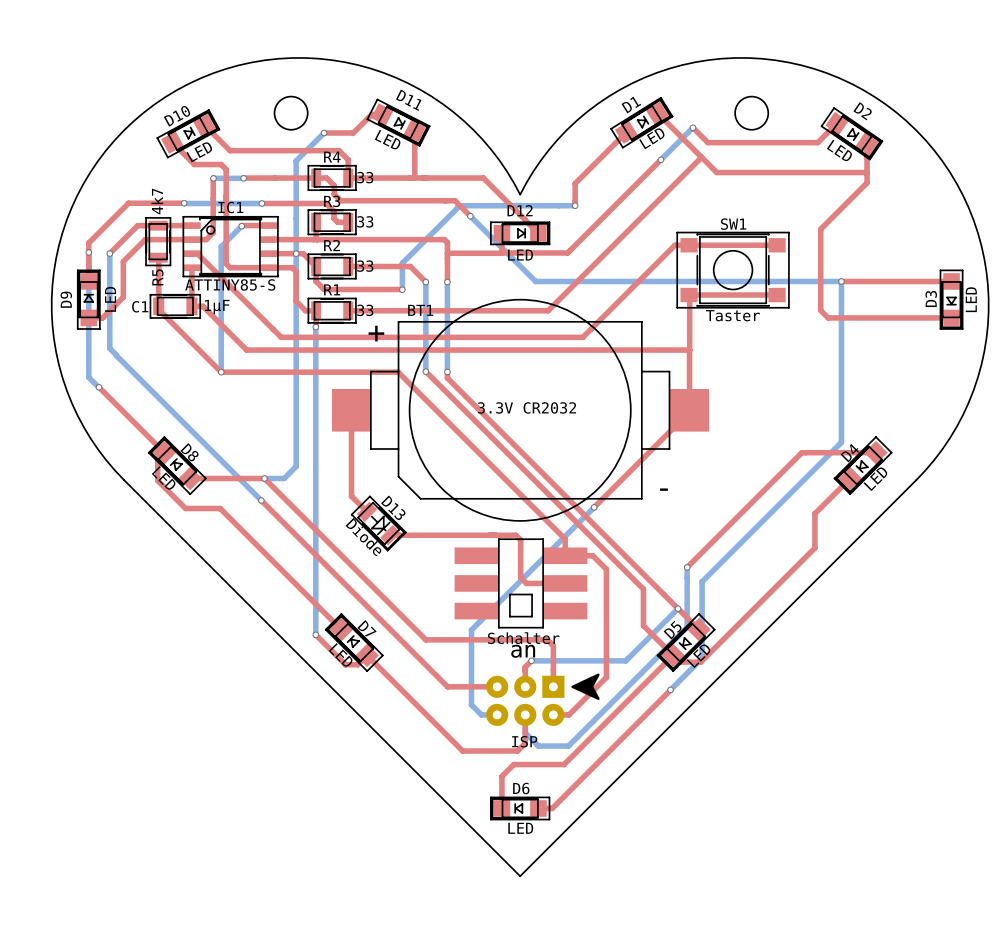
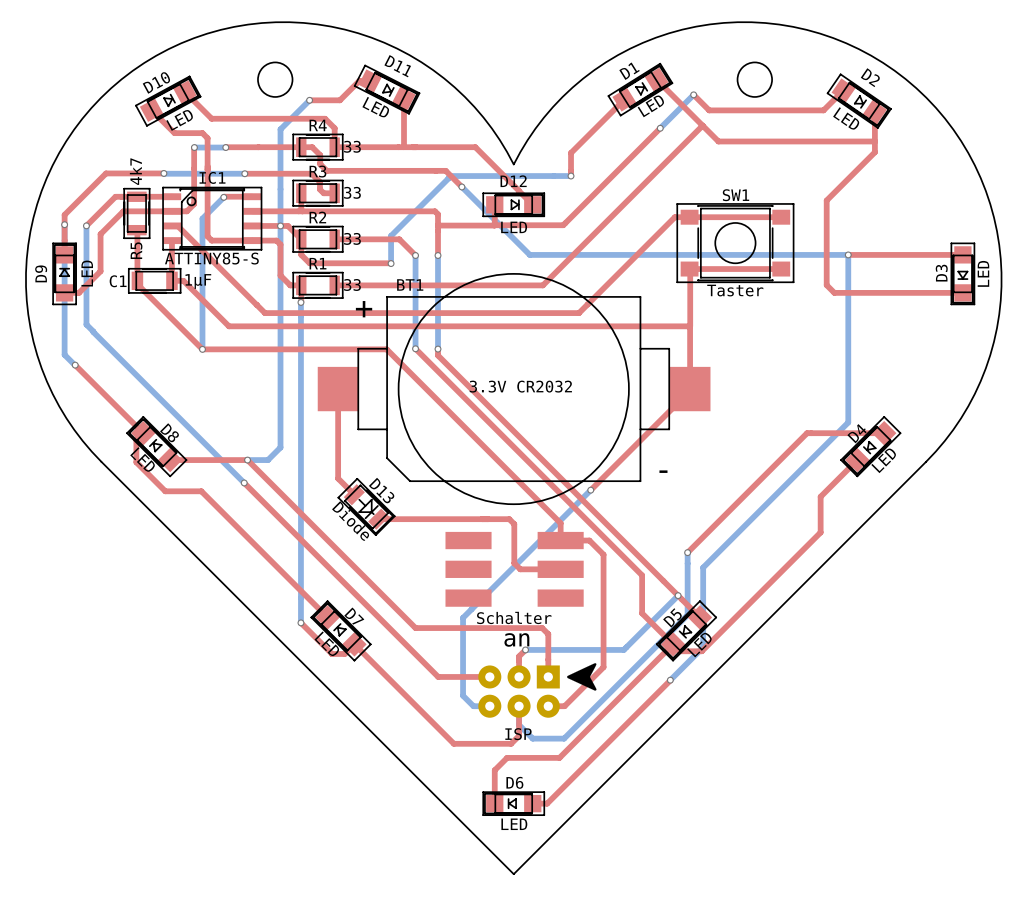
part footprint: [454, 538, 588, 629] -> [445, 531, 584, 607]

